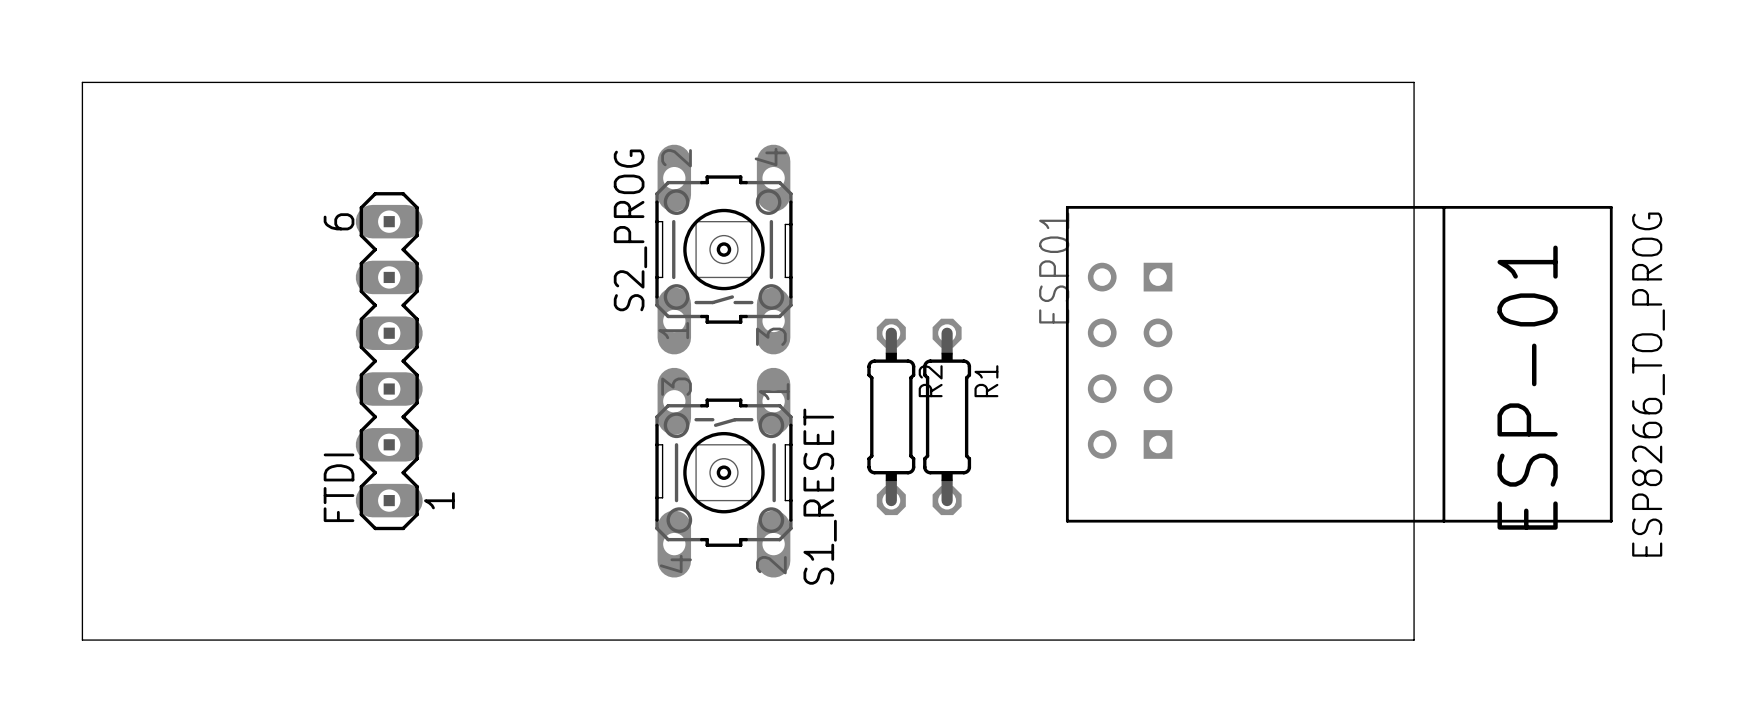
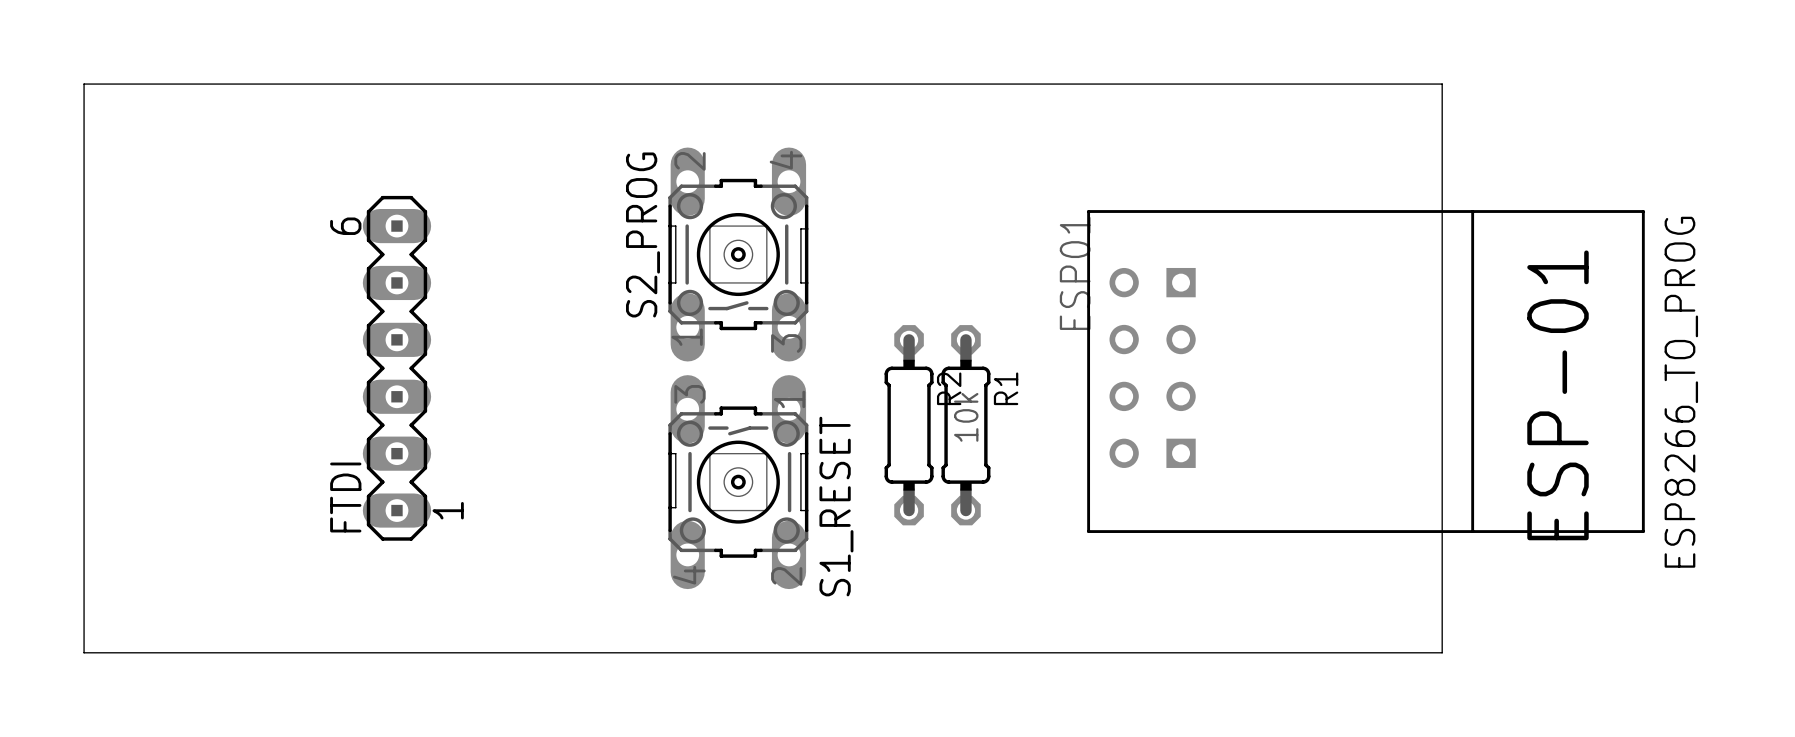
R1 value: none -> 10k (966, 417)

